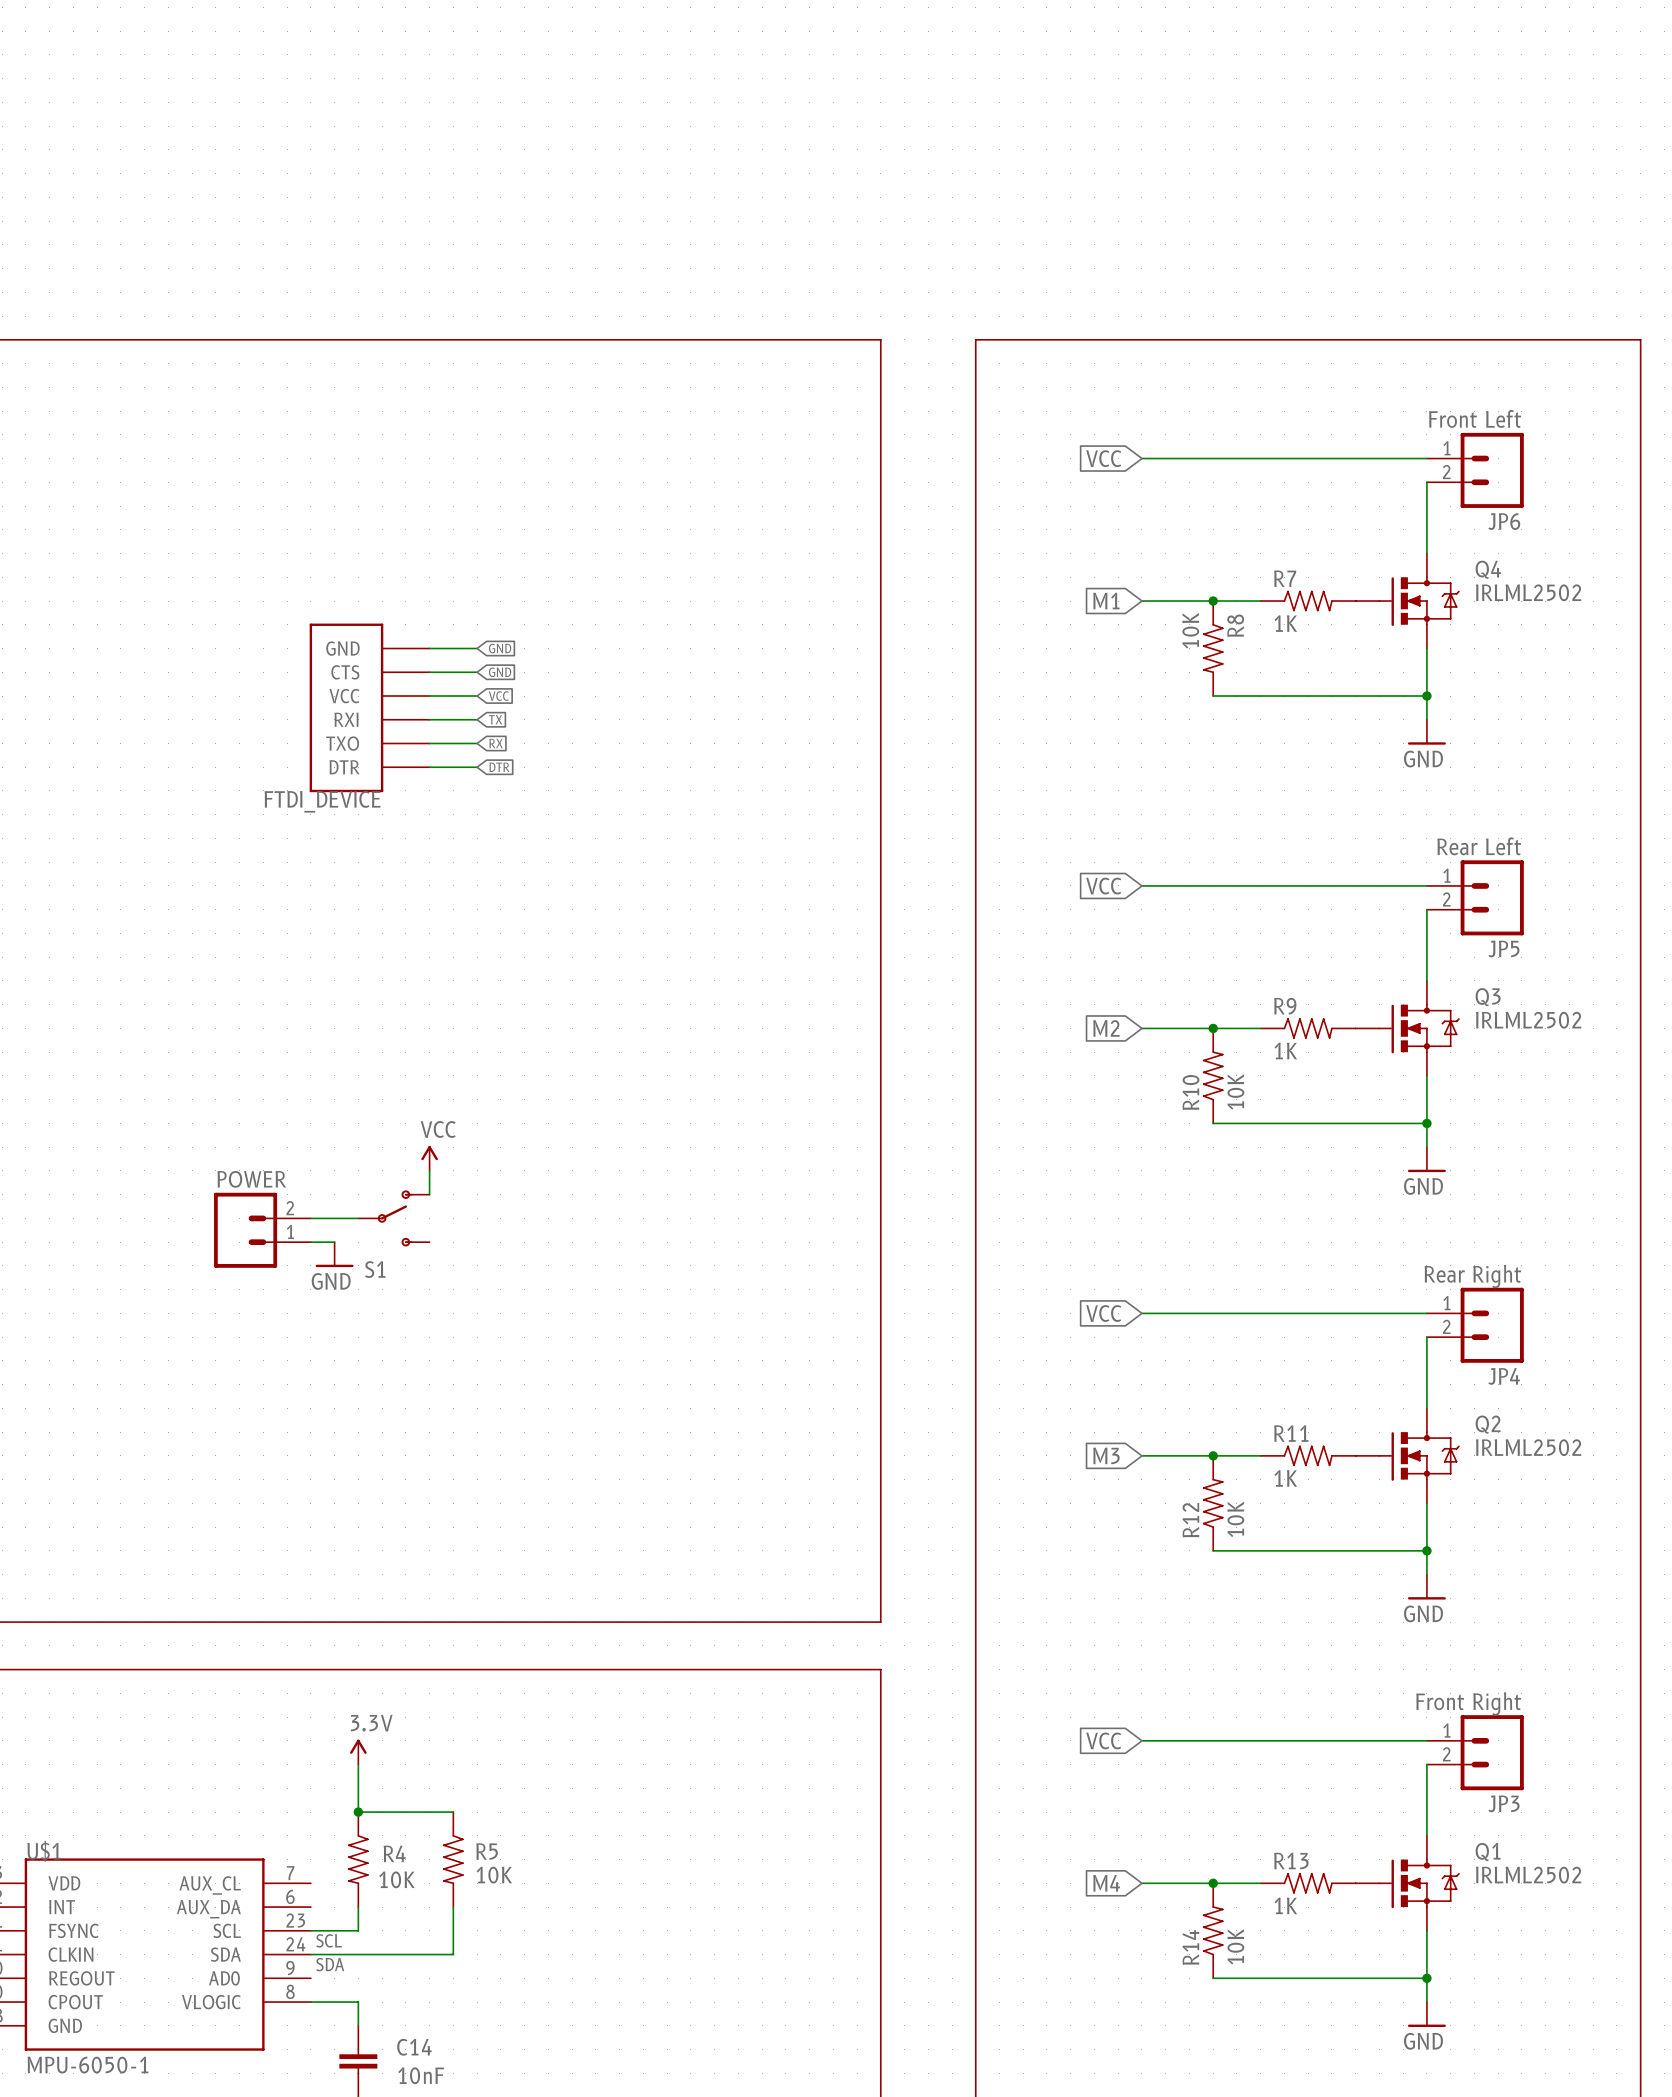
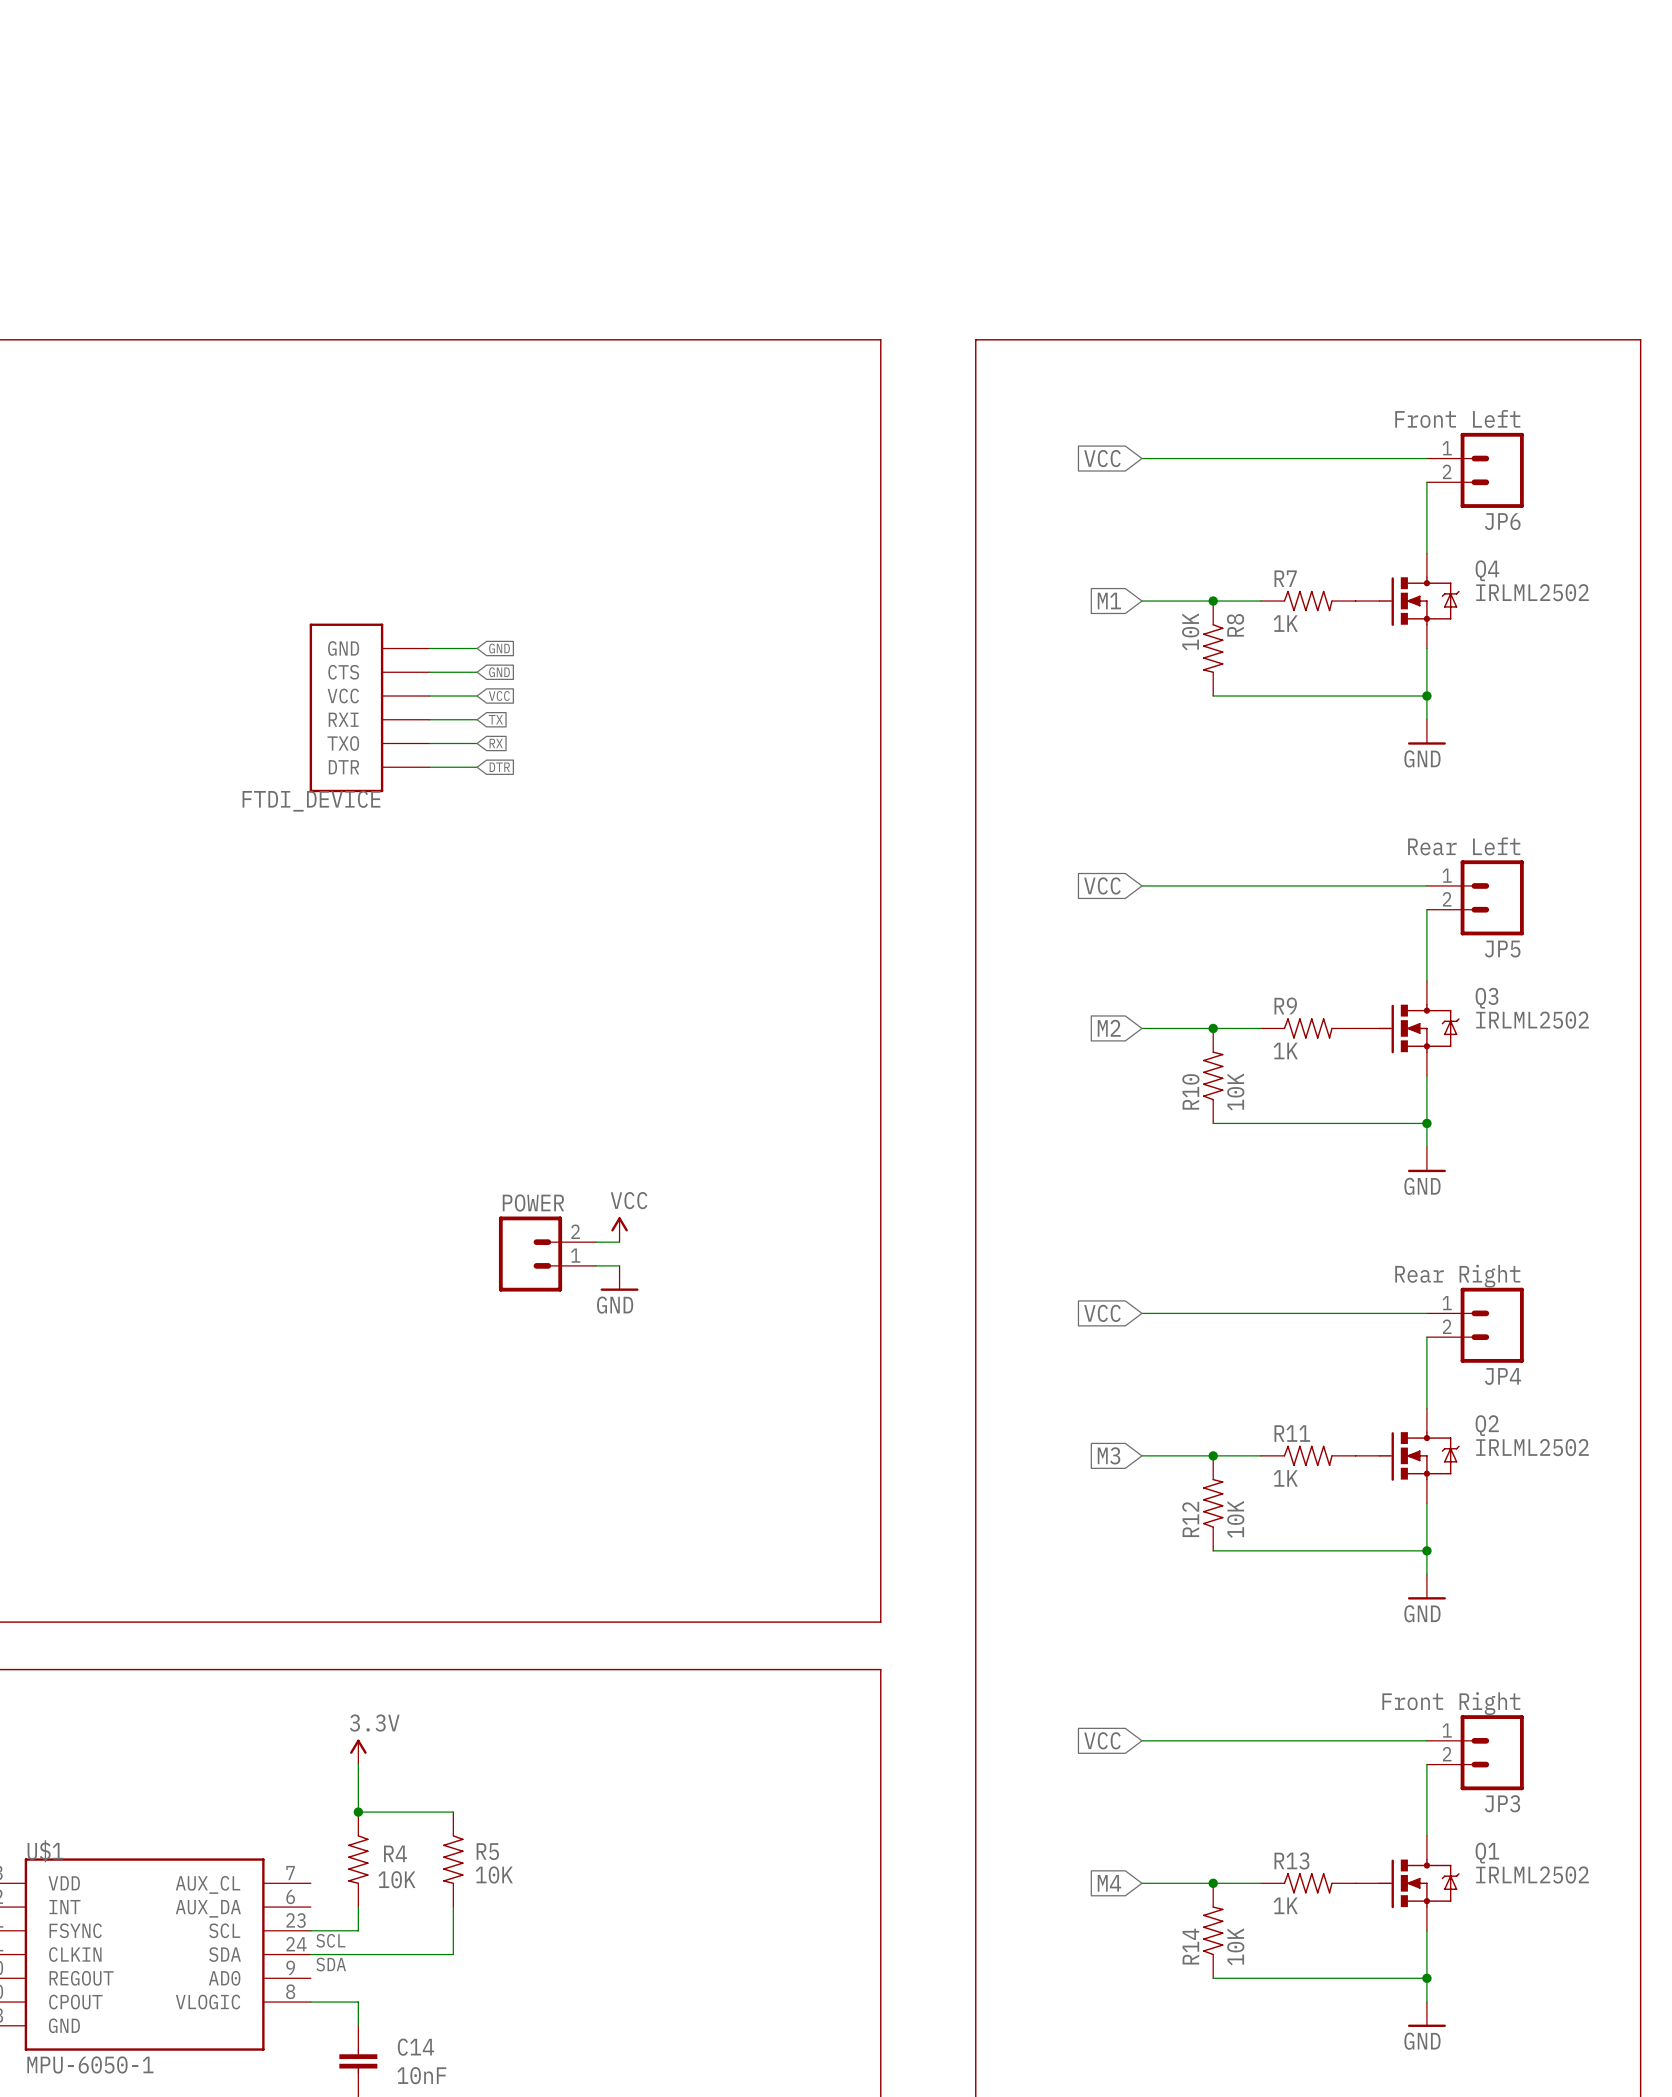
power symbol position: VCC (429, 1158) -> VCC (619, 1229)
wire: (429, 1170) (429, 1194) -> none
wire: (310, 1218) (358, 1218) -> none
S1: (393, 1218) -> none
POWER: (262, 1230) -> none
wire: (310, 1242) (334, 1242) -> none
wire: none -> (595, 1242) (619, 1242)
power symbol: GND (334, 1254) -> none
POWER: none -> (547, 1254)
wire: none -> (595, 1265) (619, 1265)
power symbol: none -> GND (619, 1278)

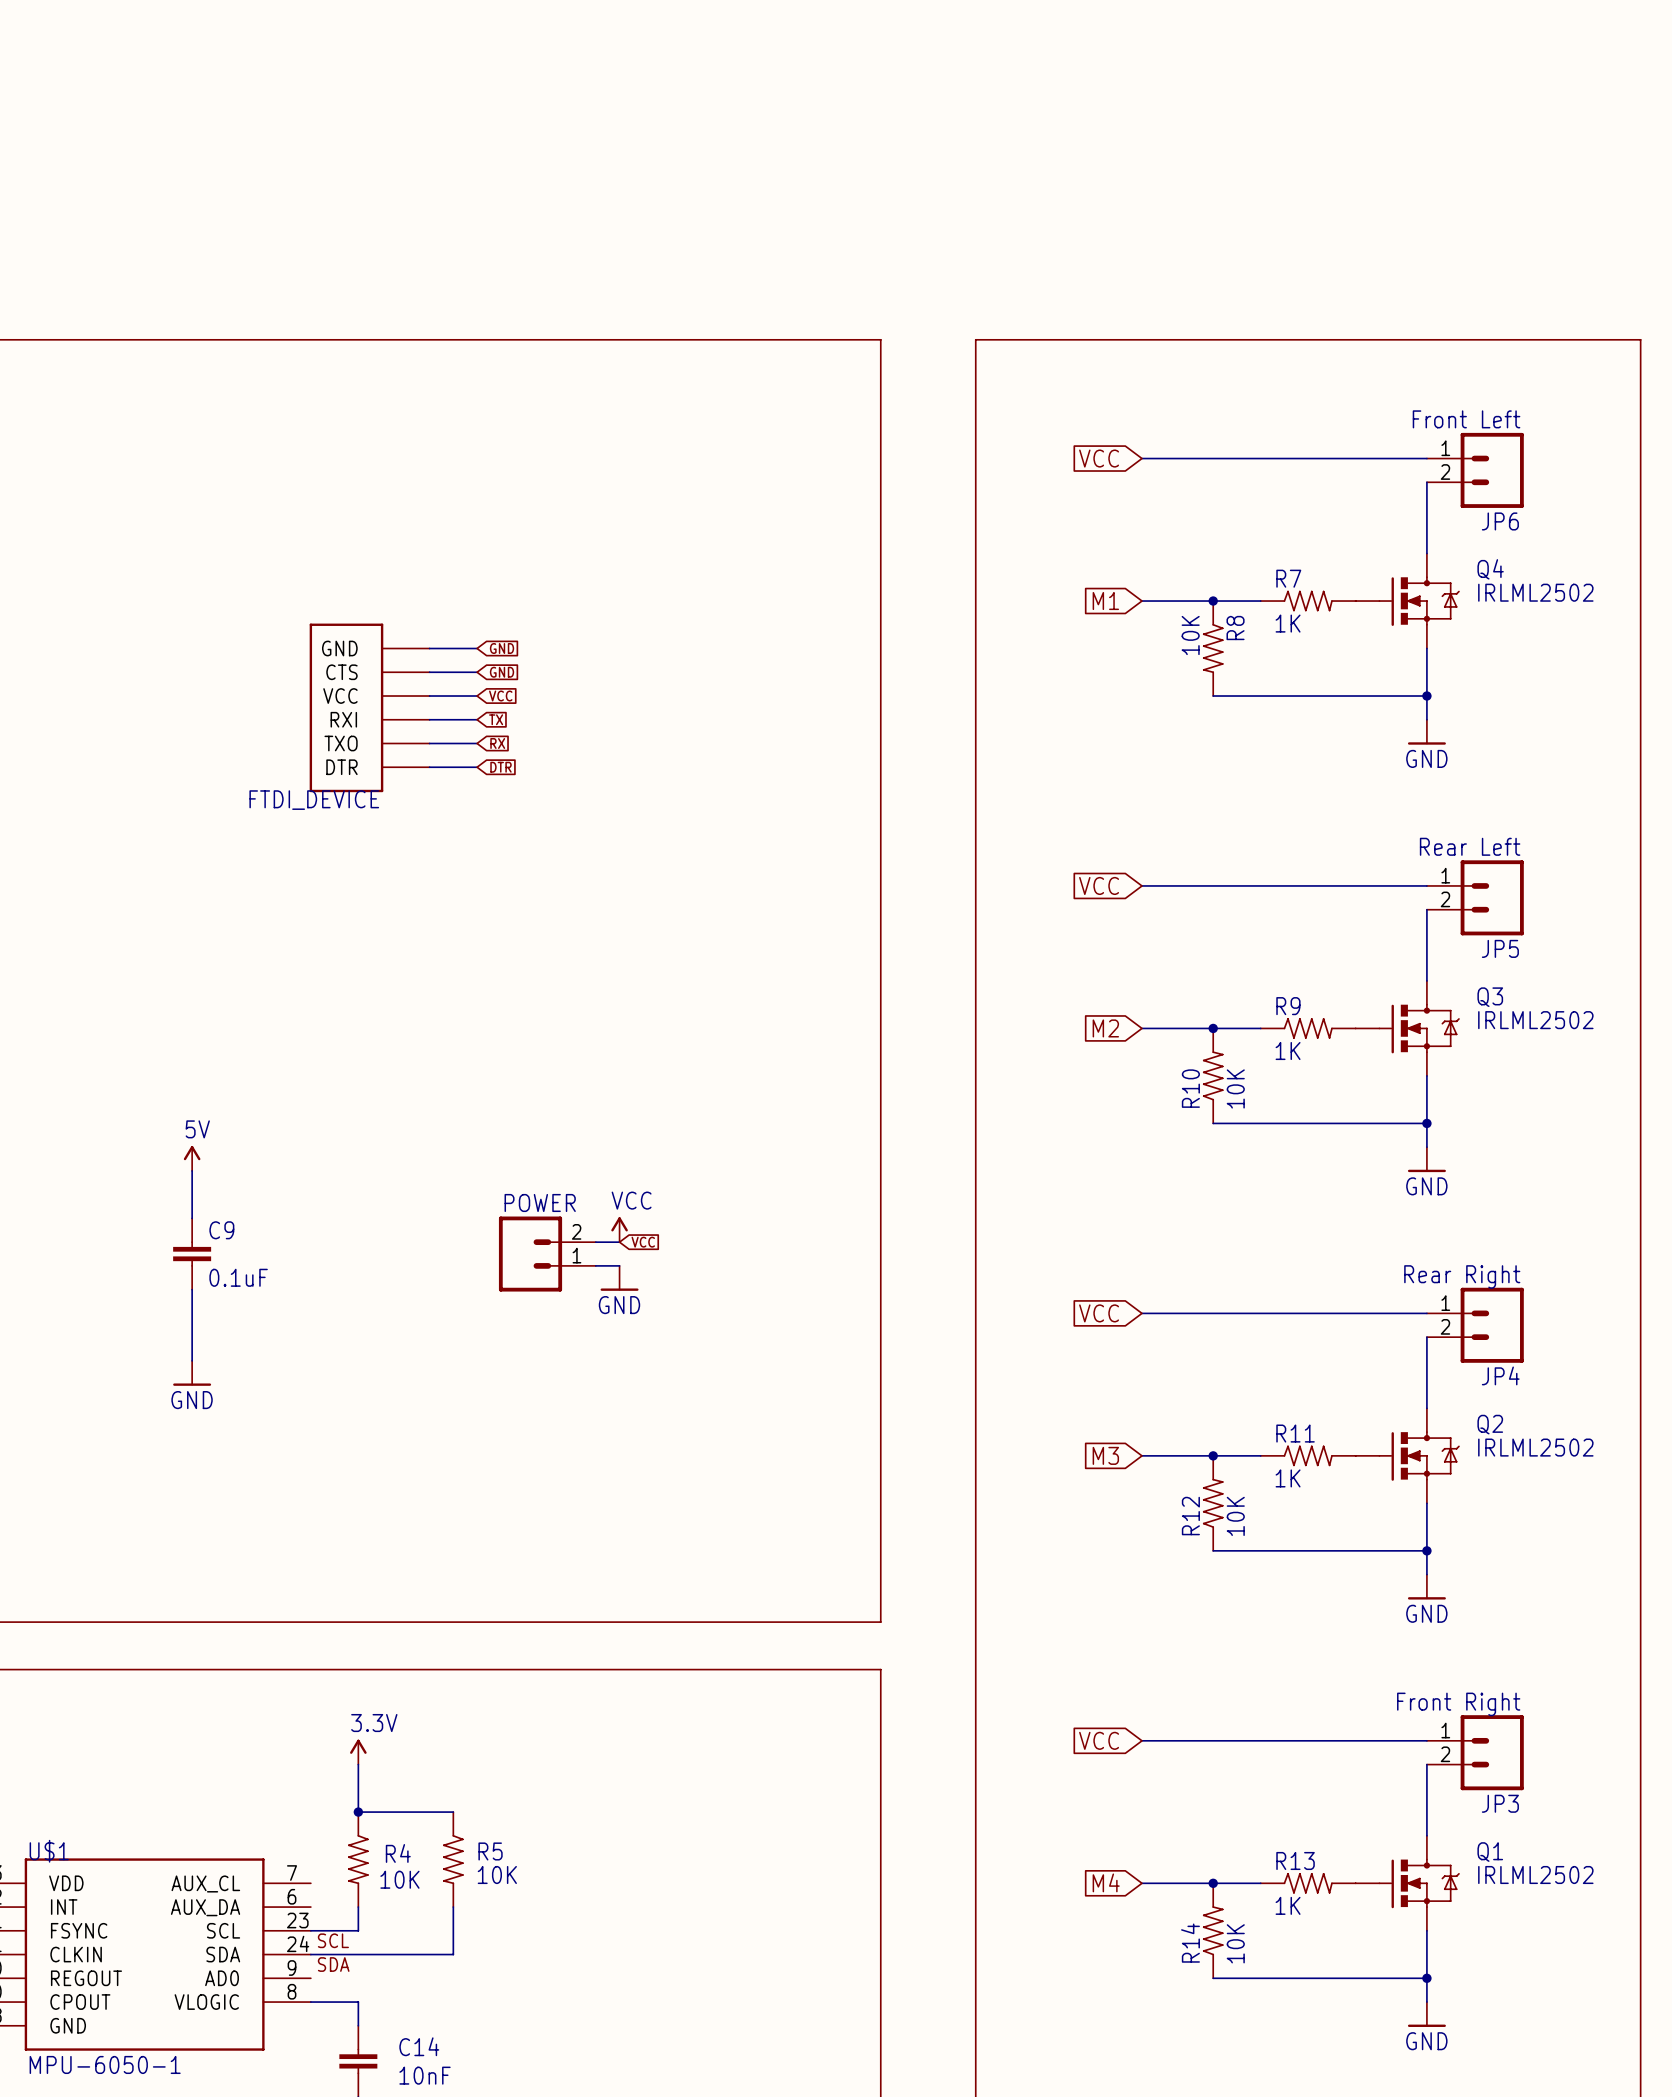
power symbol: none -> 5V (192, 1158)
wire: none -> (192, 1170) (192, 1218)
global label: none -> VCC (643, 1242)
C9: none -> 0.1uF (192, 1254)
wire: none -> (192, 1289) (192, 1360)
power symbol: none -> GND (192, 1373)

